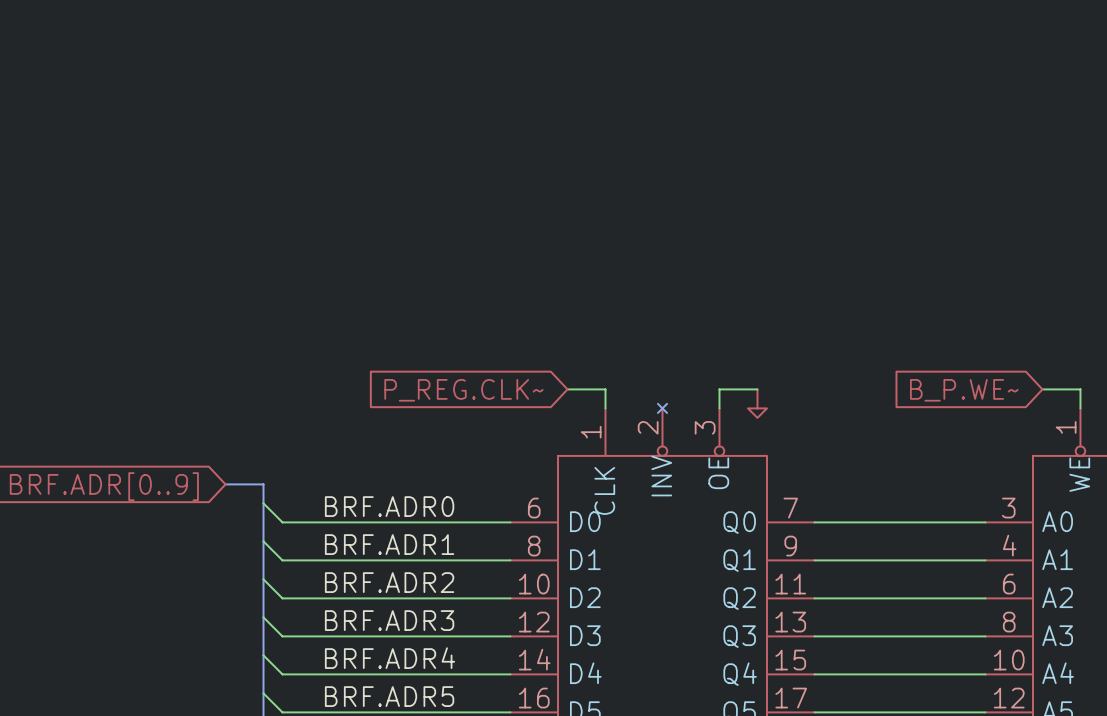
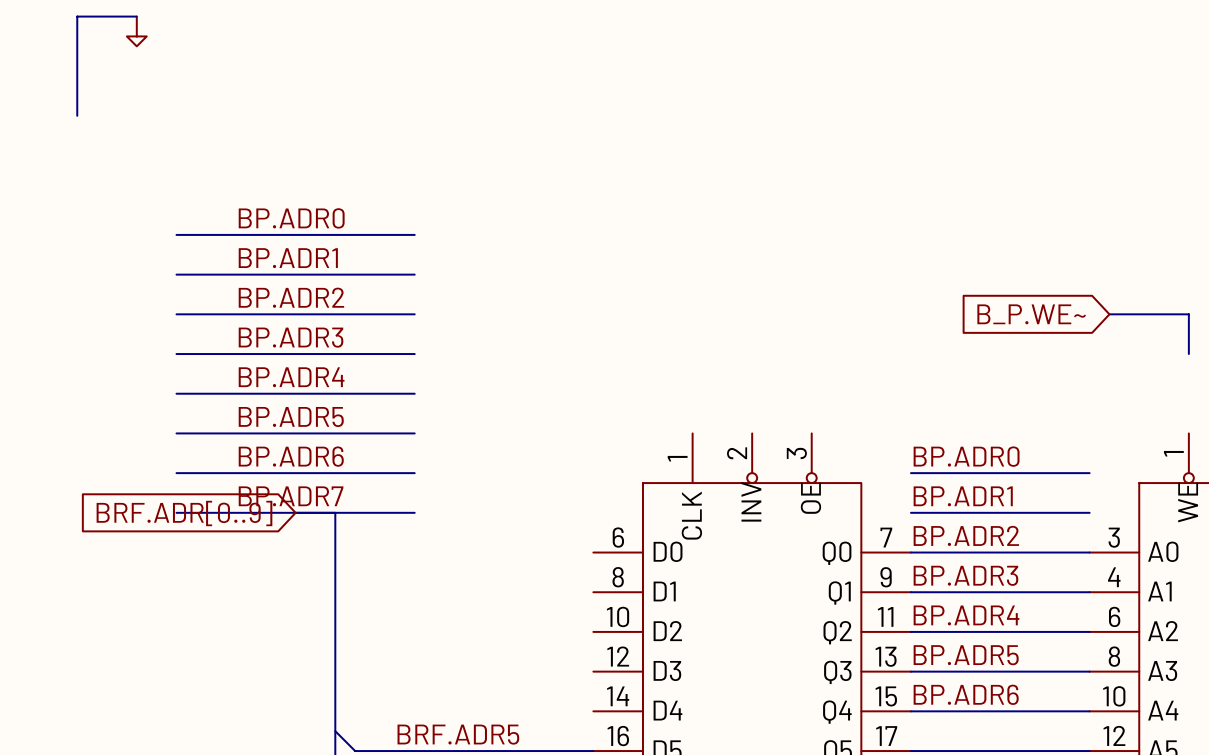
wire: none -> (136, 16) (77, 16) (77, 115)
power symbol: none -> (136, 31)
label: none -> BP.ADR0 (291, 218)
wire: none -> (176, 234) (414, 234)
label: none -> BP.ADR1 (288, 258)
wire: none -> (176, 274) (414, 274)
label: none -> BP.ADR2 (291, 297)
wire: none -> (176, 314) (414, 314)
wire: none -> (1109, 314) (1188, 314) (1188, 354)
label: none -> BP.ADR3 (291, 337)
wire: none -> (176, 354) (414, 354)
label: none -> BP.ADR4 (291, 377)
wire: none -> (176, 393) (414, 393)
wire: (567, 389) (605, 389) (605, 408) -> none
wire: (757, 389) (719, 389) (719, 408) -> none
wire: (1042, 389) (1080, 389) (1080, 408) -> none
global label: P_REG.CLK~ (463, 390) -> none
global label position: B_P.WE~ (964, 390) -> B_P.WE~ (1031, 314)
label: none -> BP.ADR5 (291, 416)
power symbol: (757, 403) -> none
wire: none -> (176, 433) (414, 433)
no-connect mark: (662, 408) -> none
label: none -> BP.ADR6 (291, 456)
label: none -> BP.ADR0 (966, 456)
wire: none -> (176, 473) (414, 473)
wire: none -> (910, 473) (1089, 473)
label: none -> BP.ADR7 (291, 496)
label: none -> BP.ADR1 (963, 496)
wire: none -> (176, 512) (414, 512)
wire: none -> (910, 512) (1089, 512)
wire: (263, 503) (282, 522) (510, 522) -> none
label: BRF.ADR0 (389, 506) -> none
label: none -> BP.ADR2 (966, 535)
wire: (263, 541) (282, 560) (510, 560) -> none
label: BRF.ADR1 (389, 544) -> none
label: none -> BP.ADR3 (965, 575)
wire: (263, 579) (282, 598) (510, 598) -> none
label: BRF.ADR2 (389, 582) -> none
label: none -> BP.ADR4 (966, 615)
wire: (263, 617) (282, 636) (510, 636) -> none
label: BRF.ADR3 (389, 620) -> none
label: none -> BP.ADR5 (966, 655)
wire: (263, 655) (282, 674) (510, 674) -> none
label: BRF.ADR4 (390, 658) -> none
label: none -> BP.ADR6 (966, 694)

